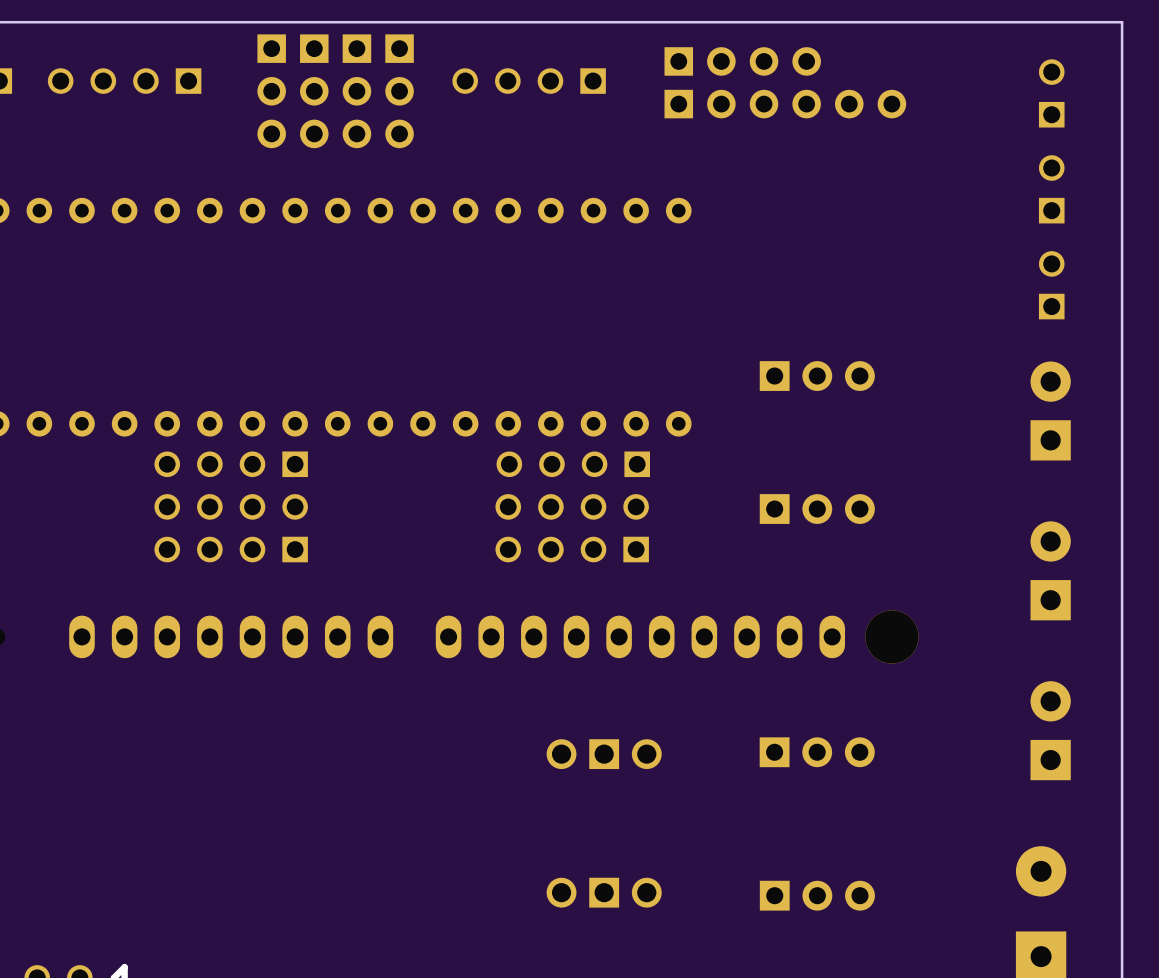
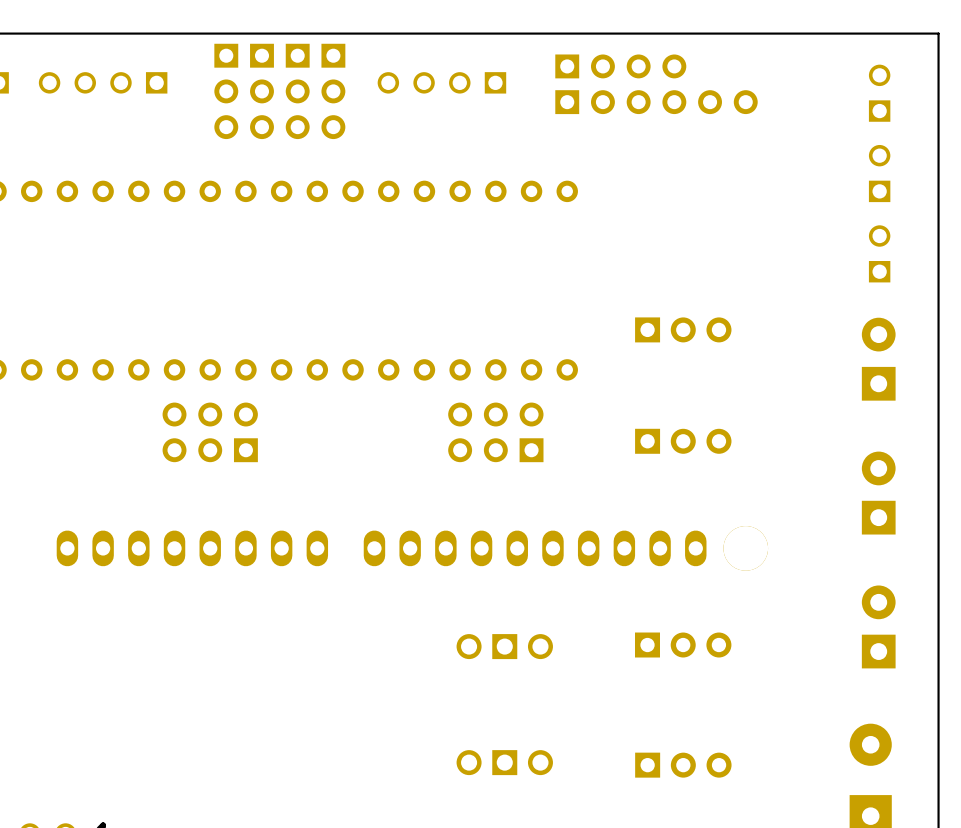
part: (231, 464) -> none
part: (573, 464) -> none
part: none -> (210, 432)
part: none -> (495, 432)
part: (231, 528) -> none
part: (572, 528) -> none

